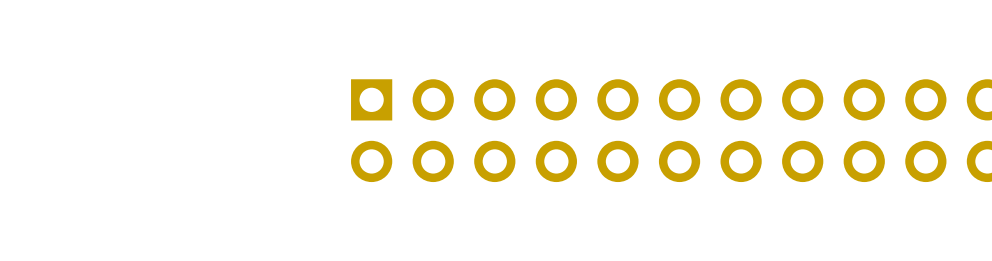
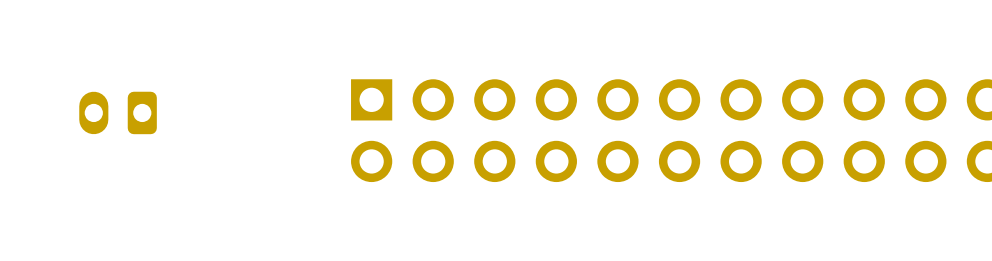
part: none -> (118, 112)

